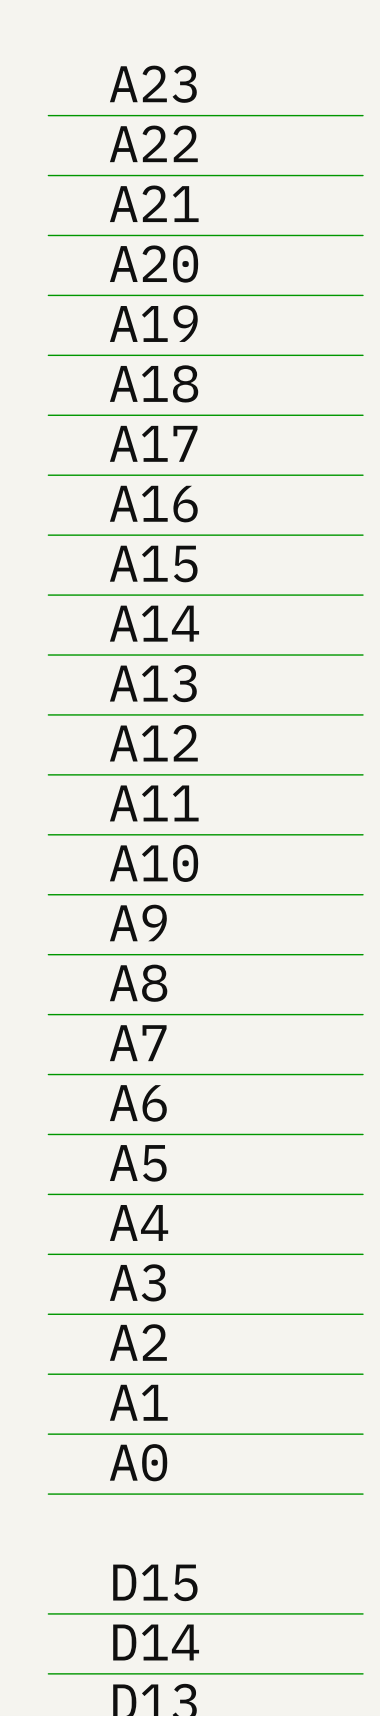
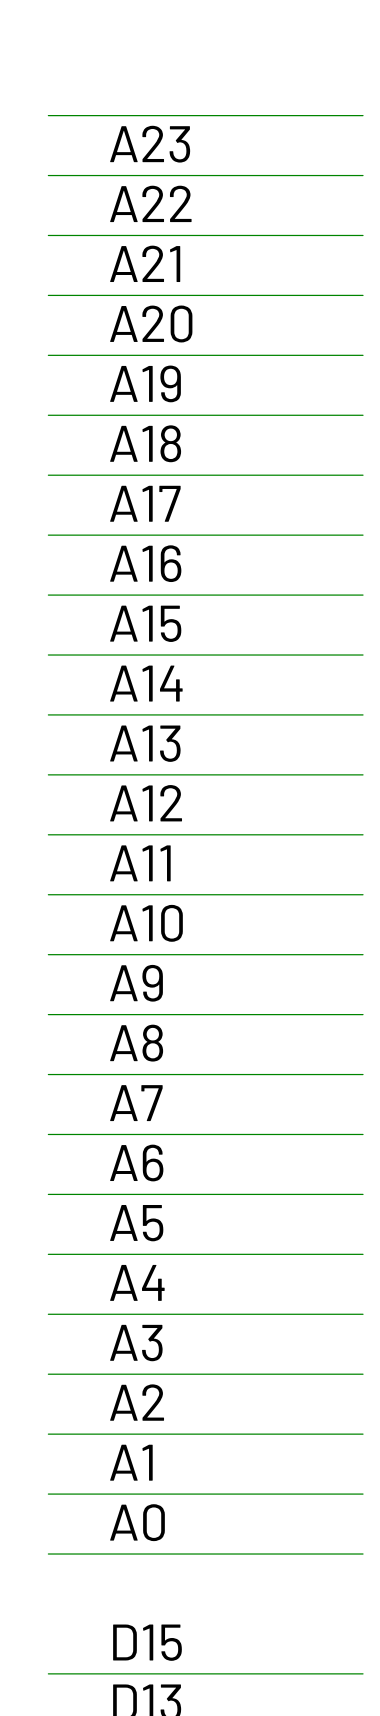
label: A23 (153, 84) -> none
label: A22 (153, 143) -> A23 (150, 144)
label: A21 (154, 203) -> A22 (150, 203)
label: A20 (154, 264) -> A21 (145, 263)
label: A19 (153, 323) -> A20 (151, 323)
label: A18 (154, 383) -> A19 (145, 383)
label: A17 (153, 443) -> A18 (145, 443)
label: A16 (153, 504) -> A17 (145, 503)
label: A15 (153, 564) -> A16 (145, 563)
label: A14 (154, 623) -> A15 (145, 623)
label: A13 (153, 683) -> A14 (146, 683)
label: A12 (153, 743) -> A13 (145, 743)
label: A11 (154, 803) -> A12 (146, 803)
label: A10 (154, 863) -> A11 (140, 863)
label: A9 (138, 922) -> A10 (146, 923)
label: A8 (138, 983) -> A9 (136, 983)
label: A7 (138, 1043) -> A8 (136, 1043)
label: A6 (138, 1103) -> A7 (136, 1103)
label: A5 (138, 1163) -> A6 (136, 1163)
label: A4 (139, 1222) -> A5 (136, 1223)
label: A3 (137, 1282) -> A4 (137, 1282)
label: A2 (138, 1342) -> A3 (136, 1343)
label: A1 (138, 1402) -> A2 (137, 1402)
label: A0 (138, 1462) -> A1 (131, 1462)
label: none -> A0 (137, 1522)
label: D15 (155, 1582) -> none
wire: (48, 1613) (363, 1613) -> (48, 1554) (363, 1554)
label: D14 (156, 1642) -> D15 (147, 1642)

